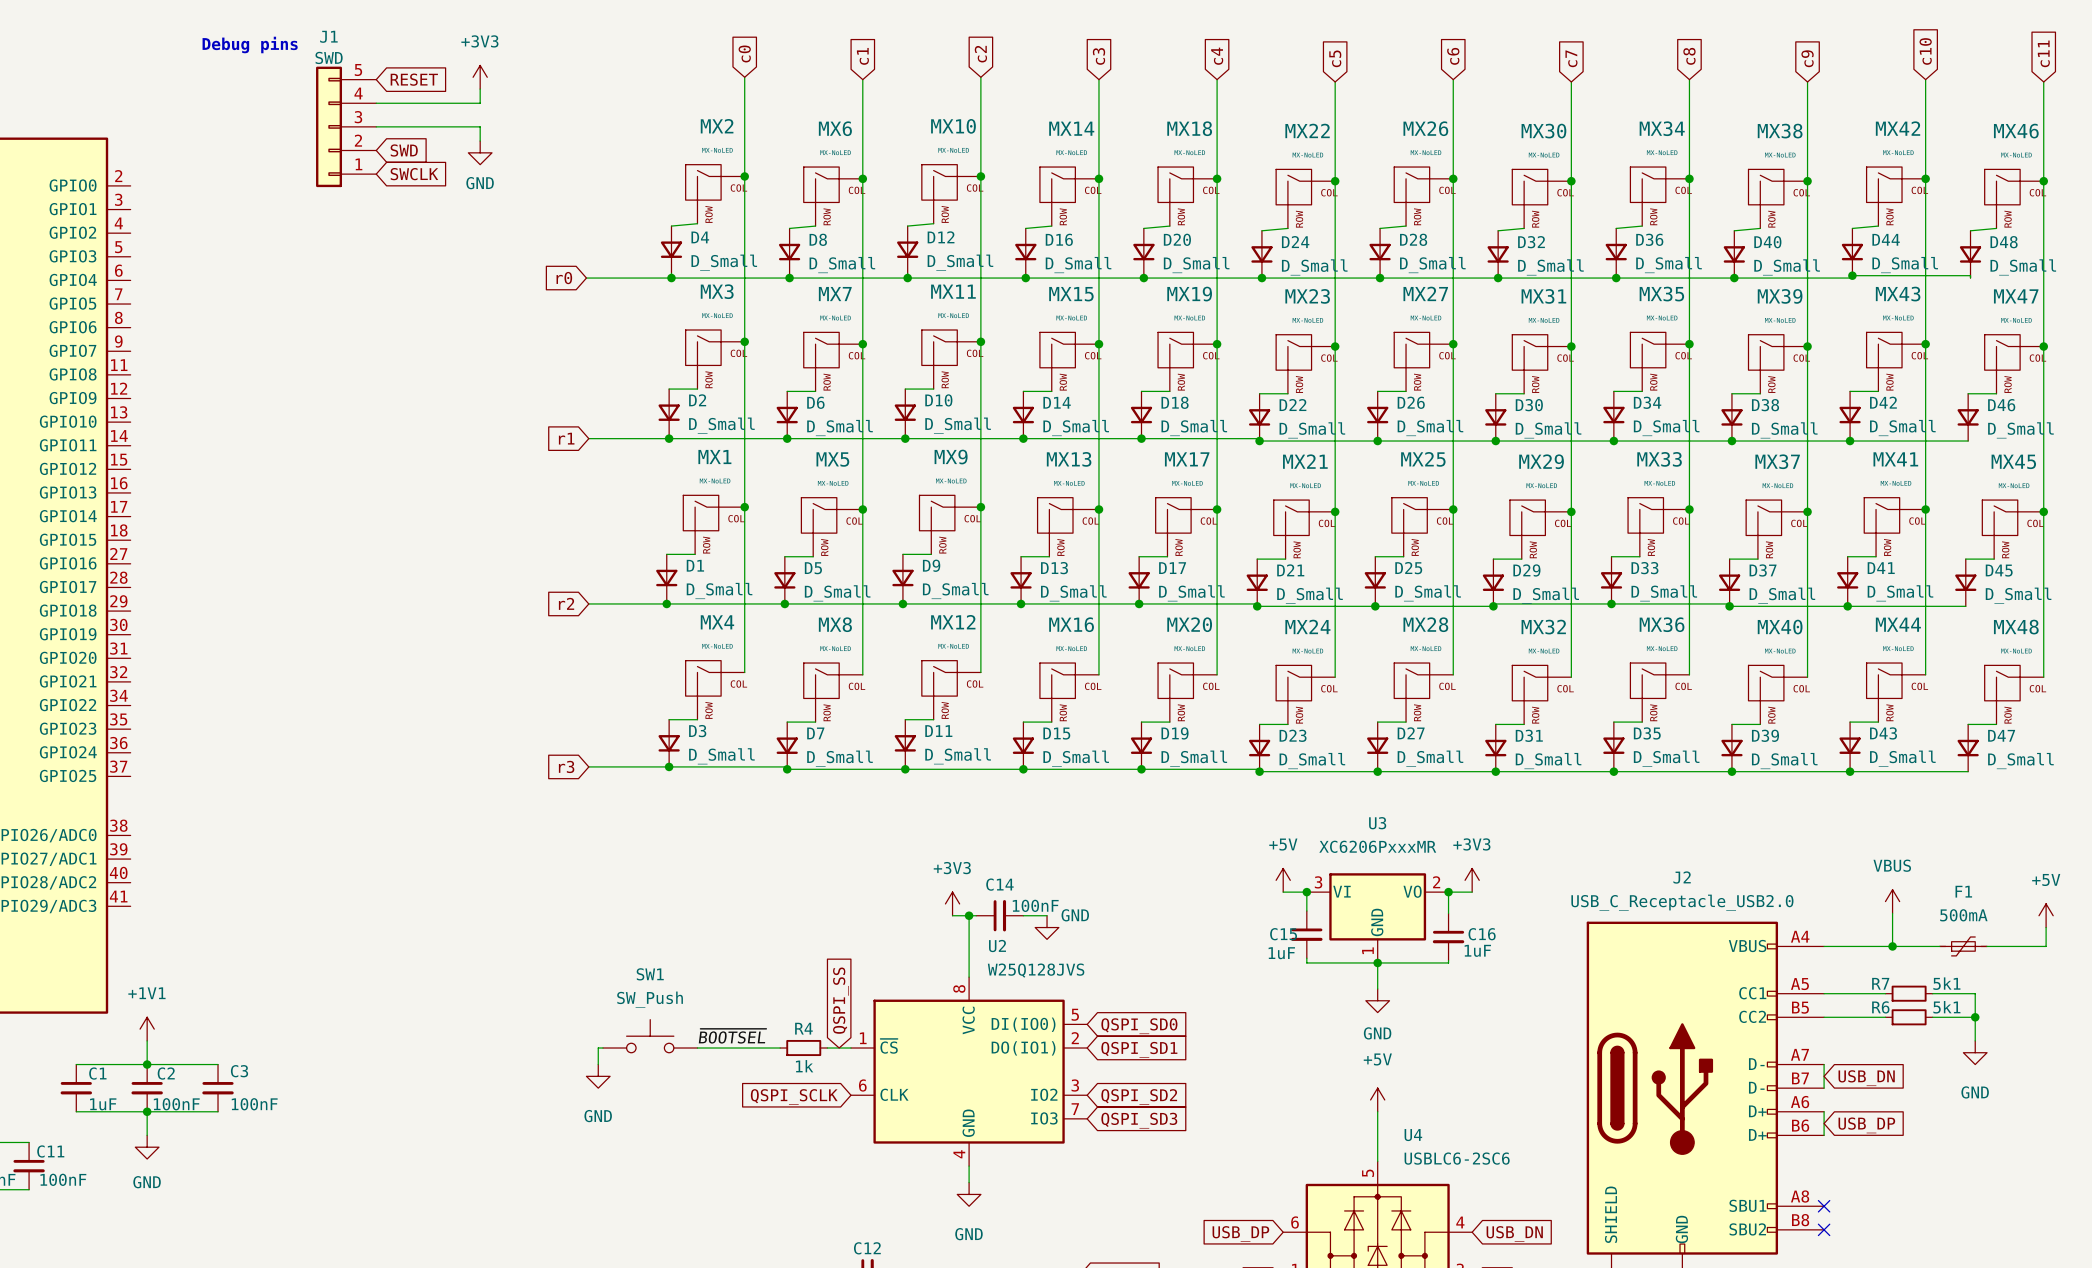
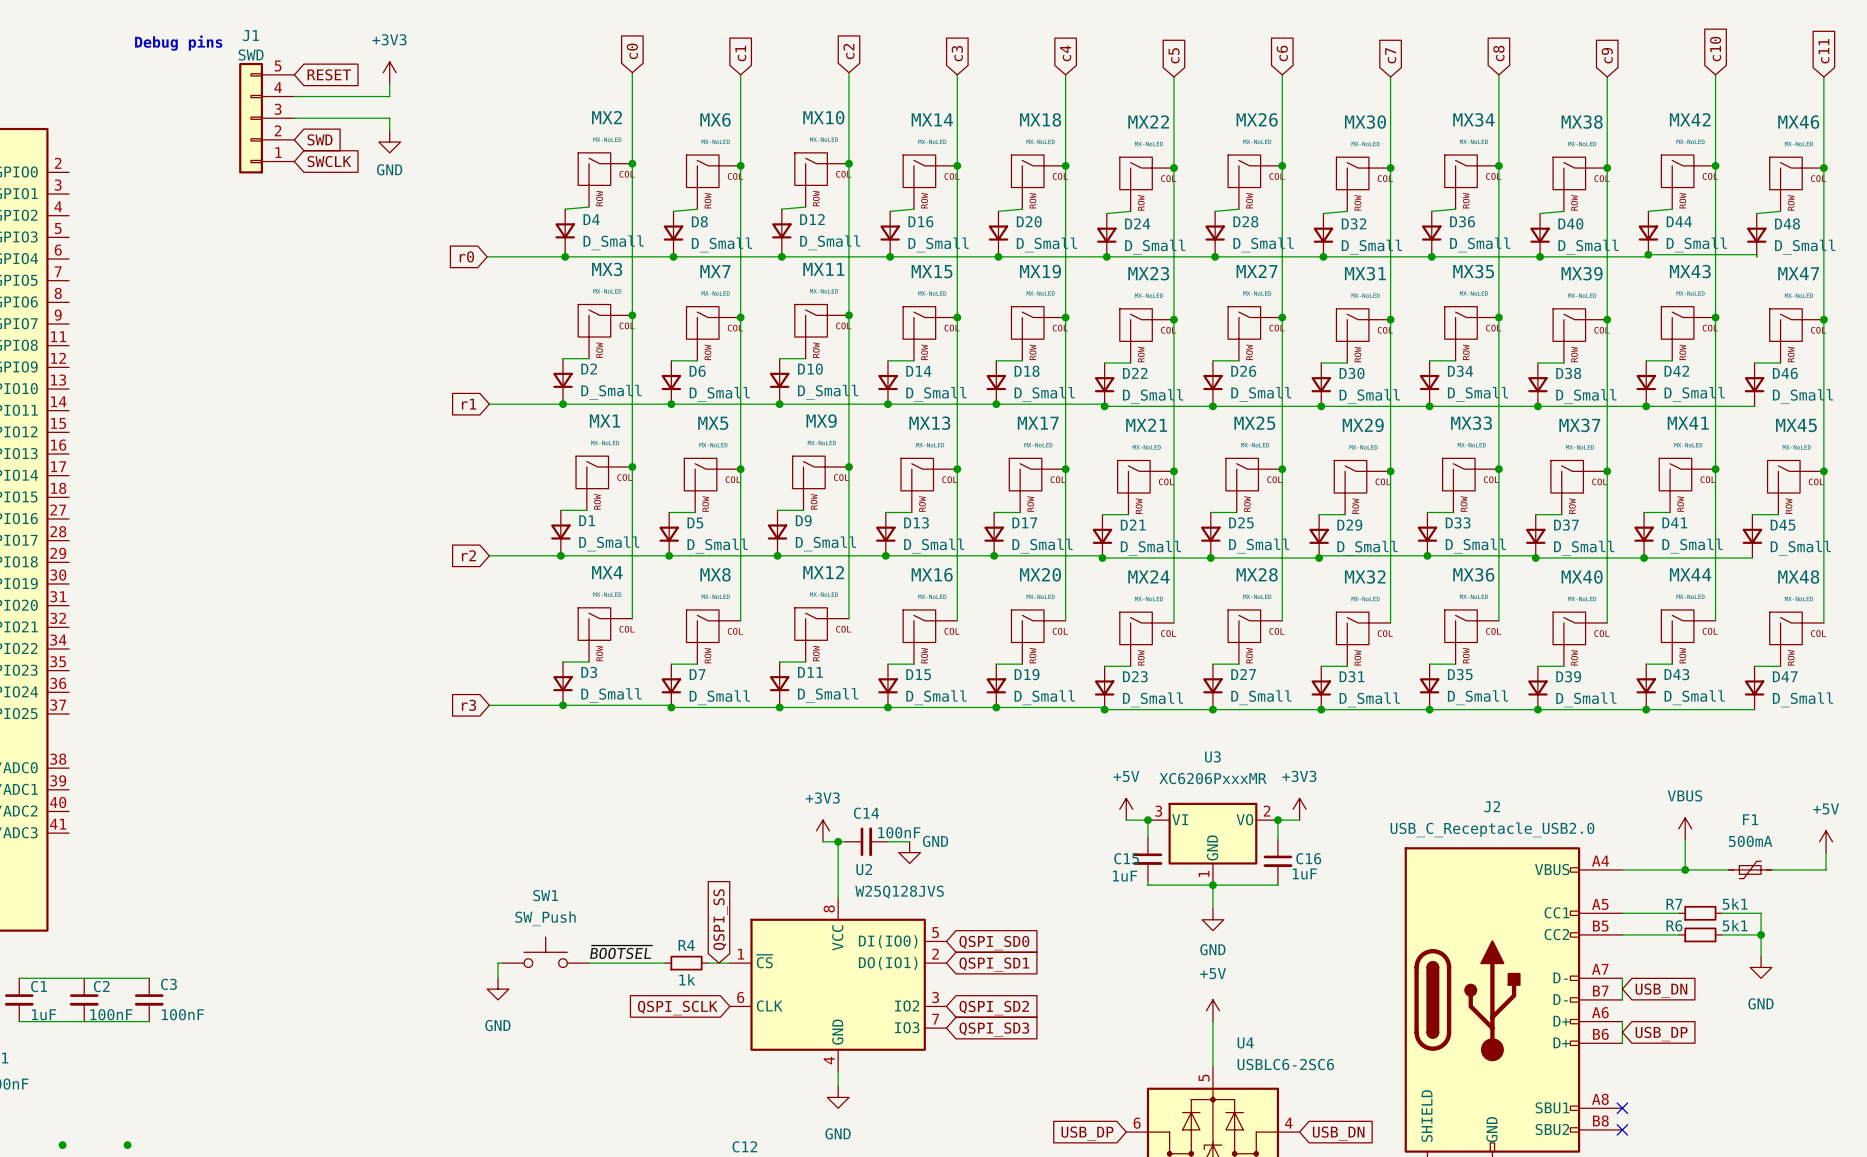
power symbol: +1V1 (147, 1029) -> none
wire: (147, 1040) (147, 1064) -> none
junction: (147, 1064) -> none
wire: (147, 1111) (147, 1135) -> none
junction: (147, 1111) -> none
power symbol: GND (147, 1147) -> none
junction: none -> (62, 1145)
junction: none -> (127, 1145)

